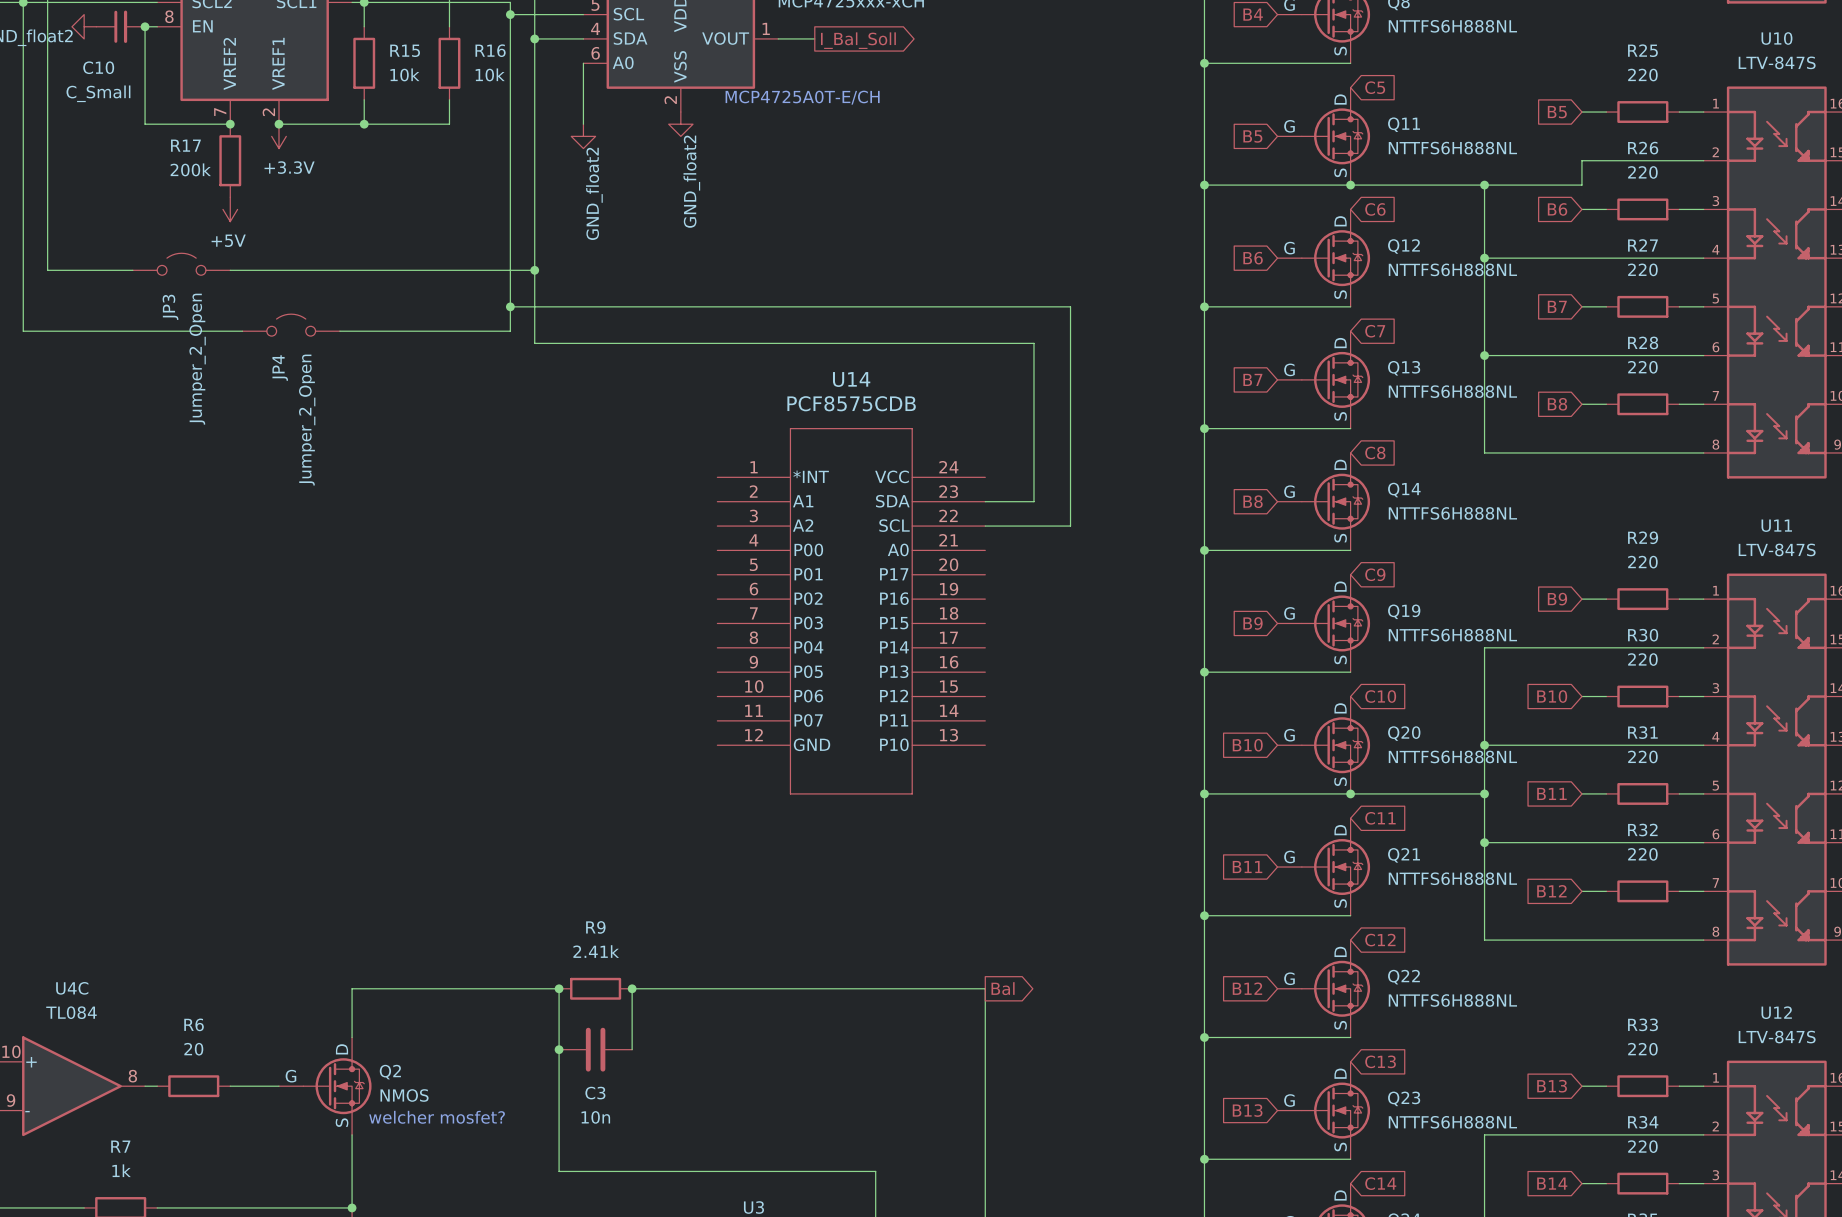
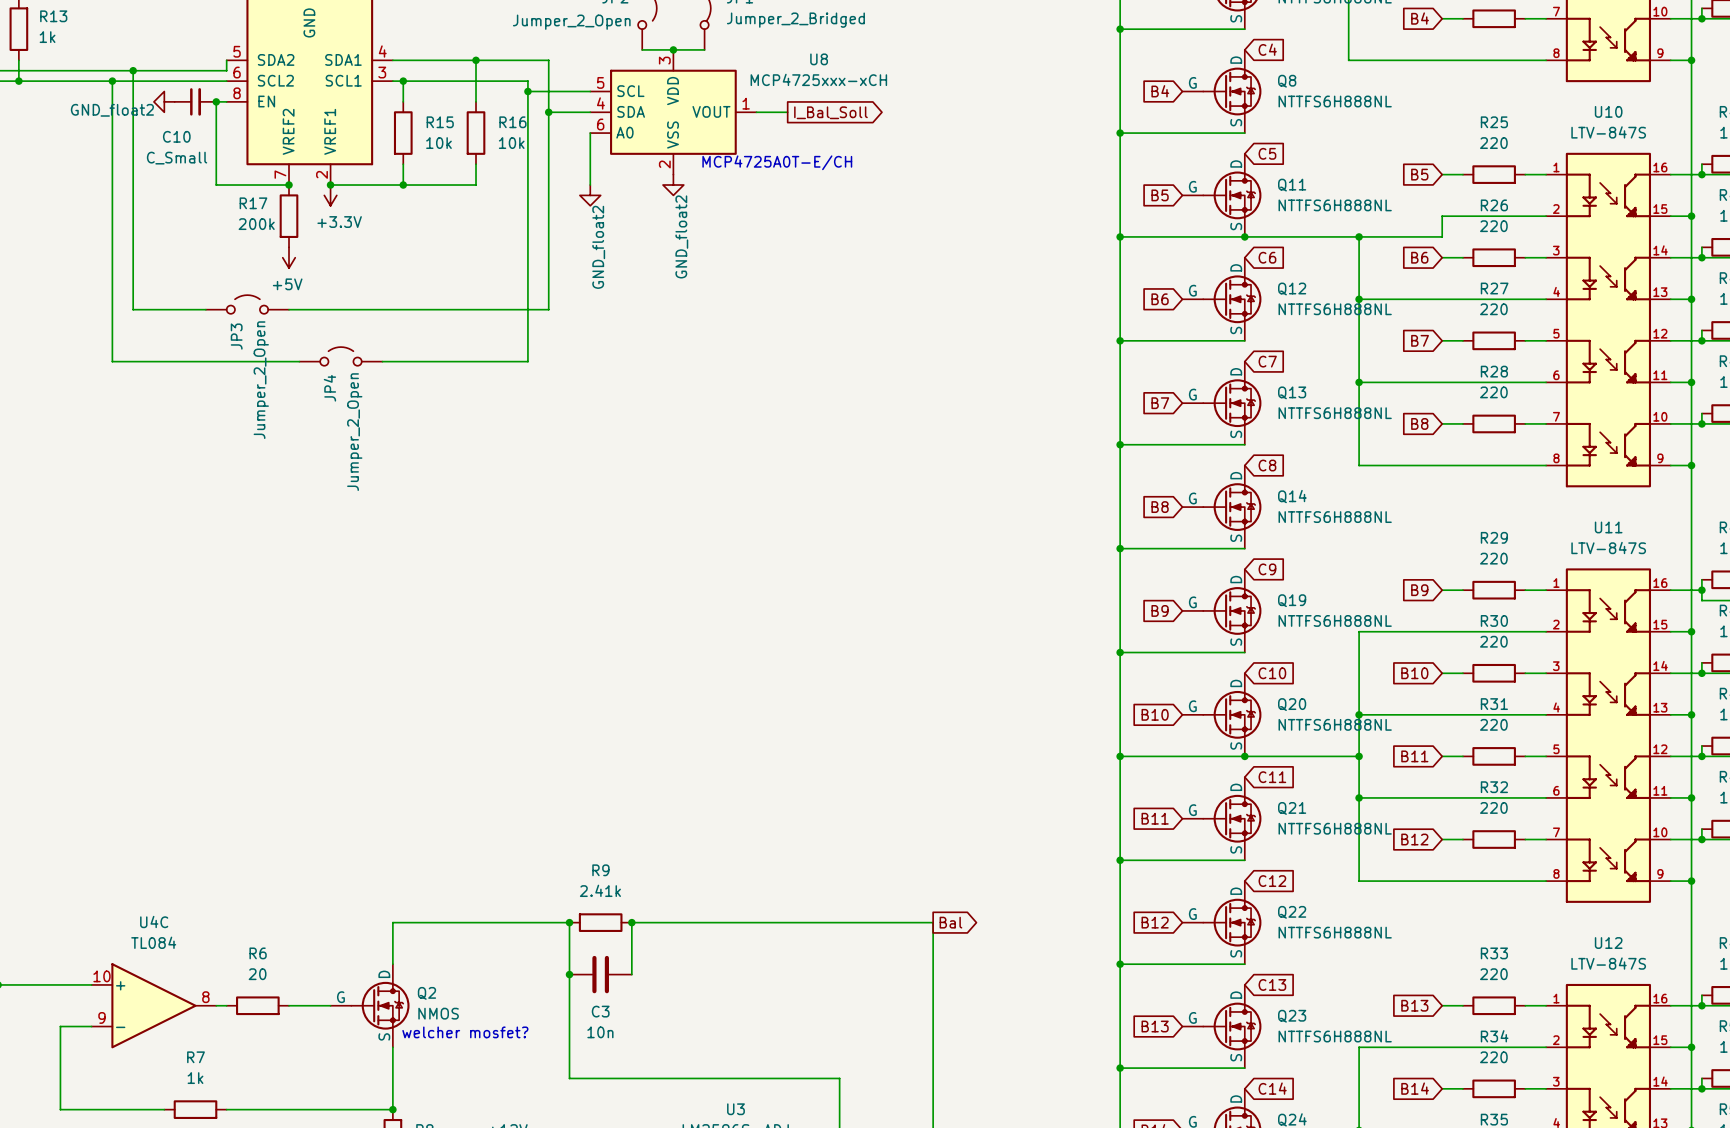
wire: (534, 270) (534, 343) (1033, 343) (1033, 501) (985, 501) -> none
junction: (534, 270) -> none
wire: (510, 306) (1070, 306) (1070, 526) (985, 526) -> none
junction: (510, 306) -> none
U14: PCF8575CDB (851, 611) -> none

